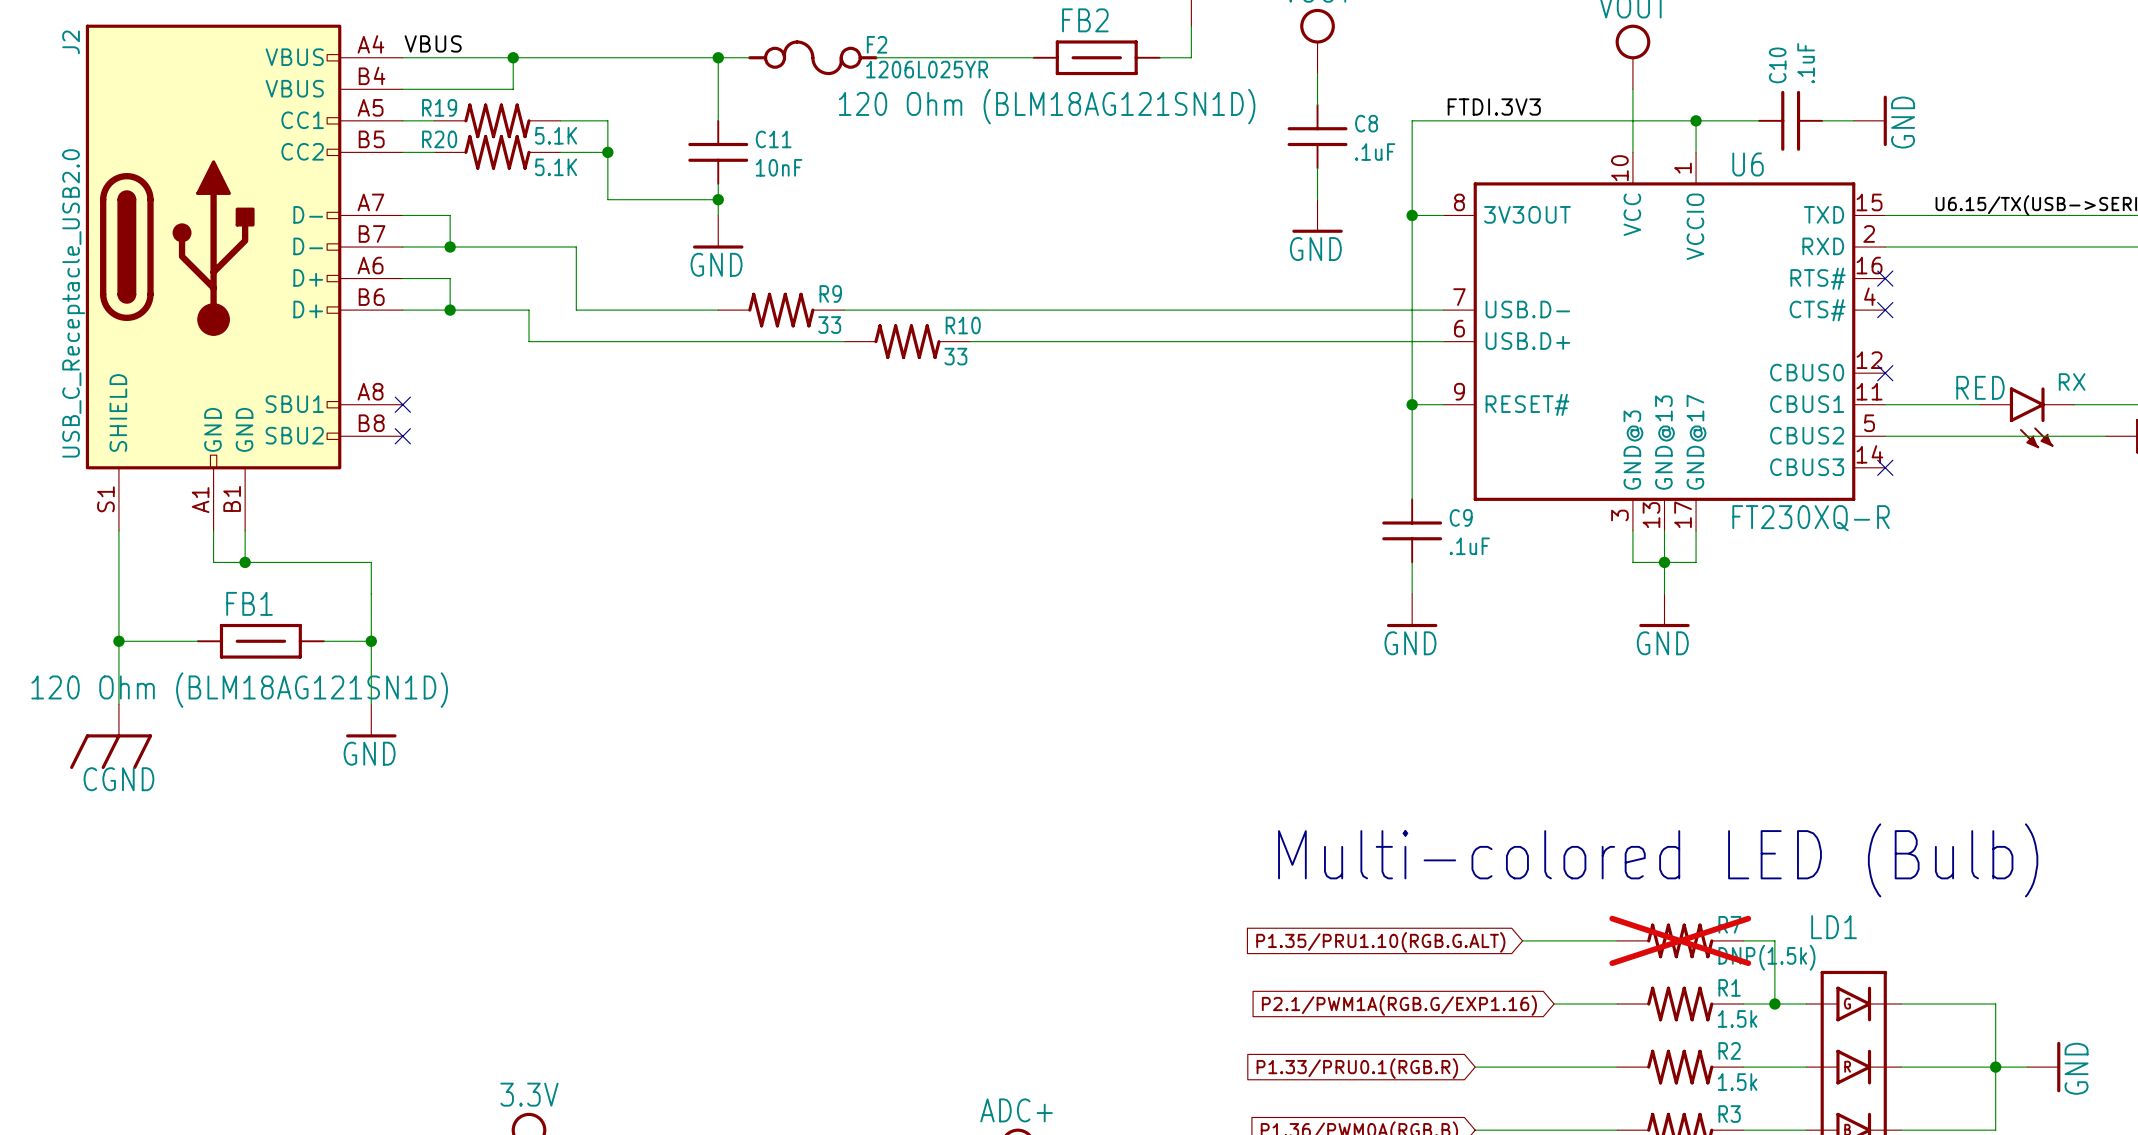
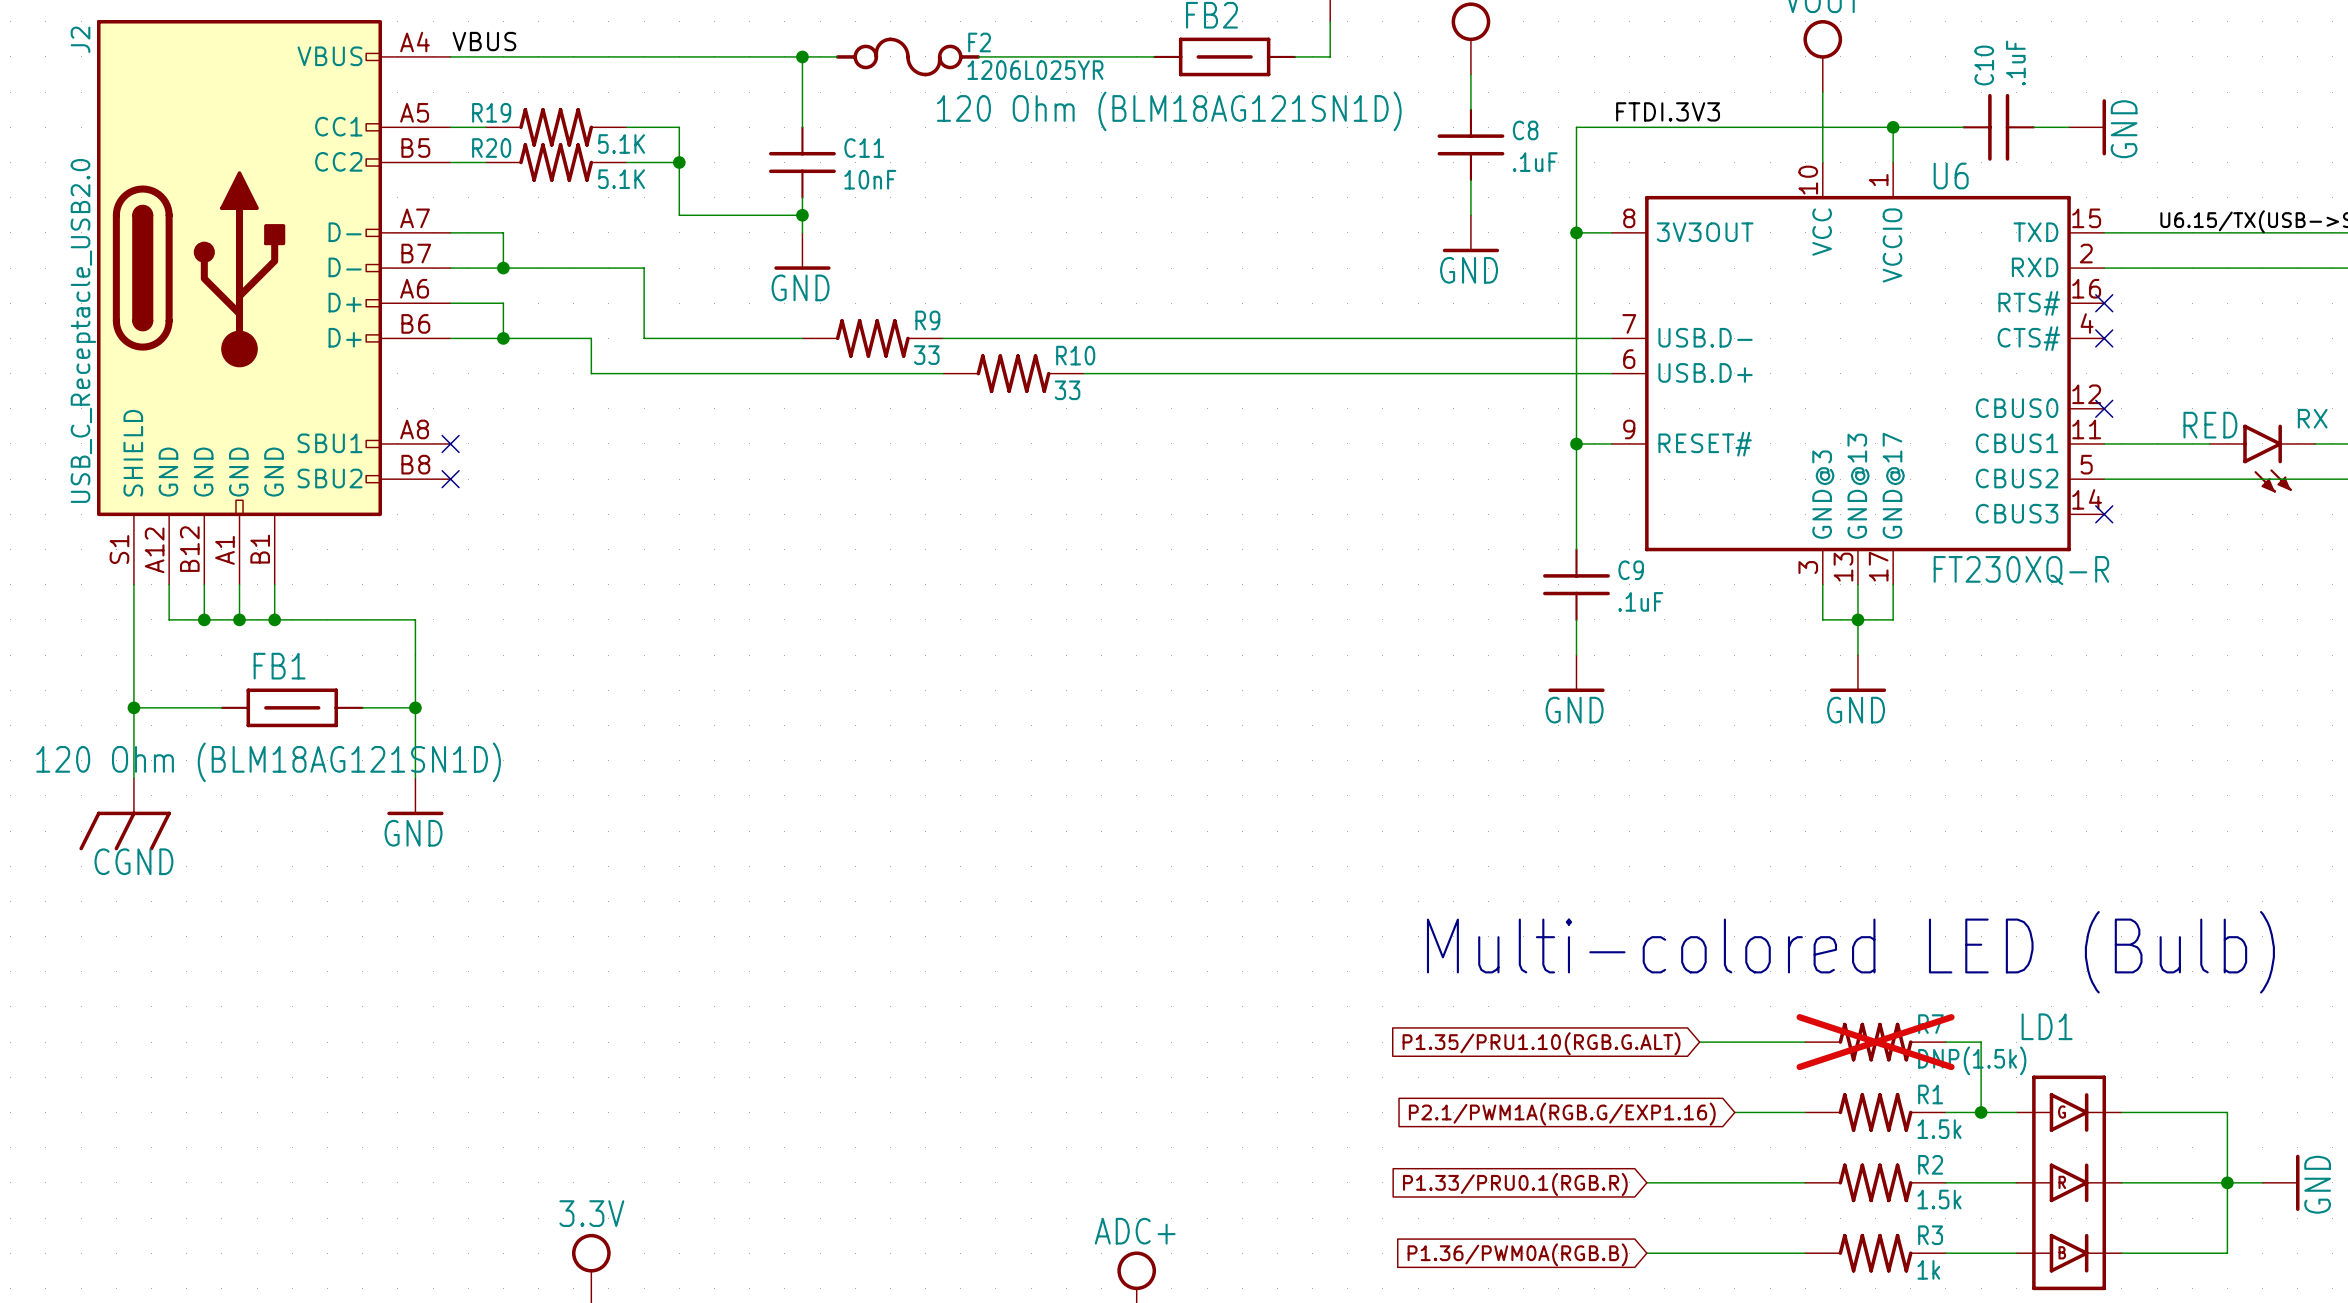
J2 symbol: [85, 24, 403, 531] -> [97, 20, 451, 585]
wire: (513, 57) (513, 89) (402, 89) -> none
junction: (513, 57) -> none
wire: none -> (169, 584) (169, 619) (239, 619)
wire: none -> (204, 584) (204, 619)
junction: none -> (204, 619)
junction: none -> (239, 619)

